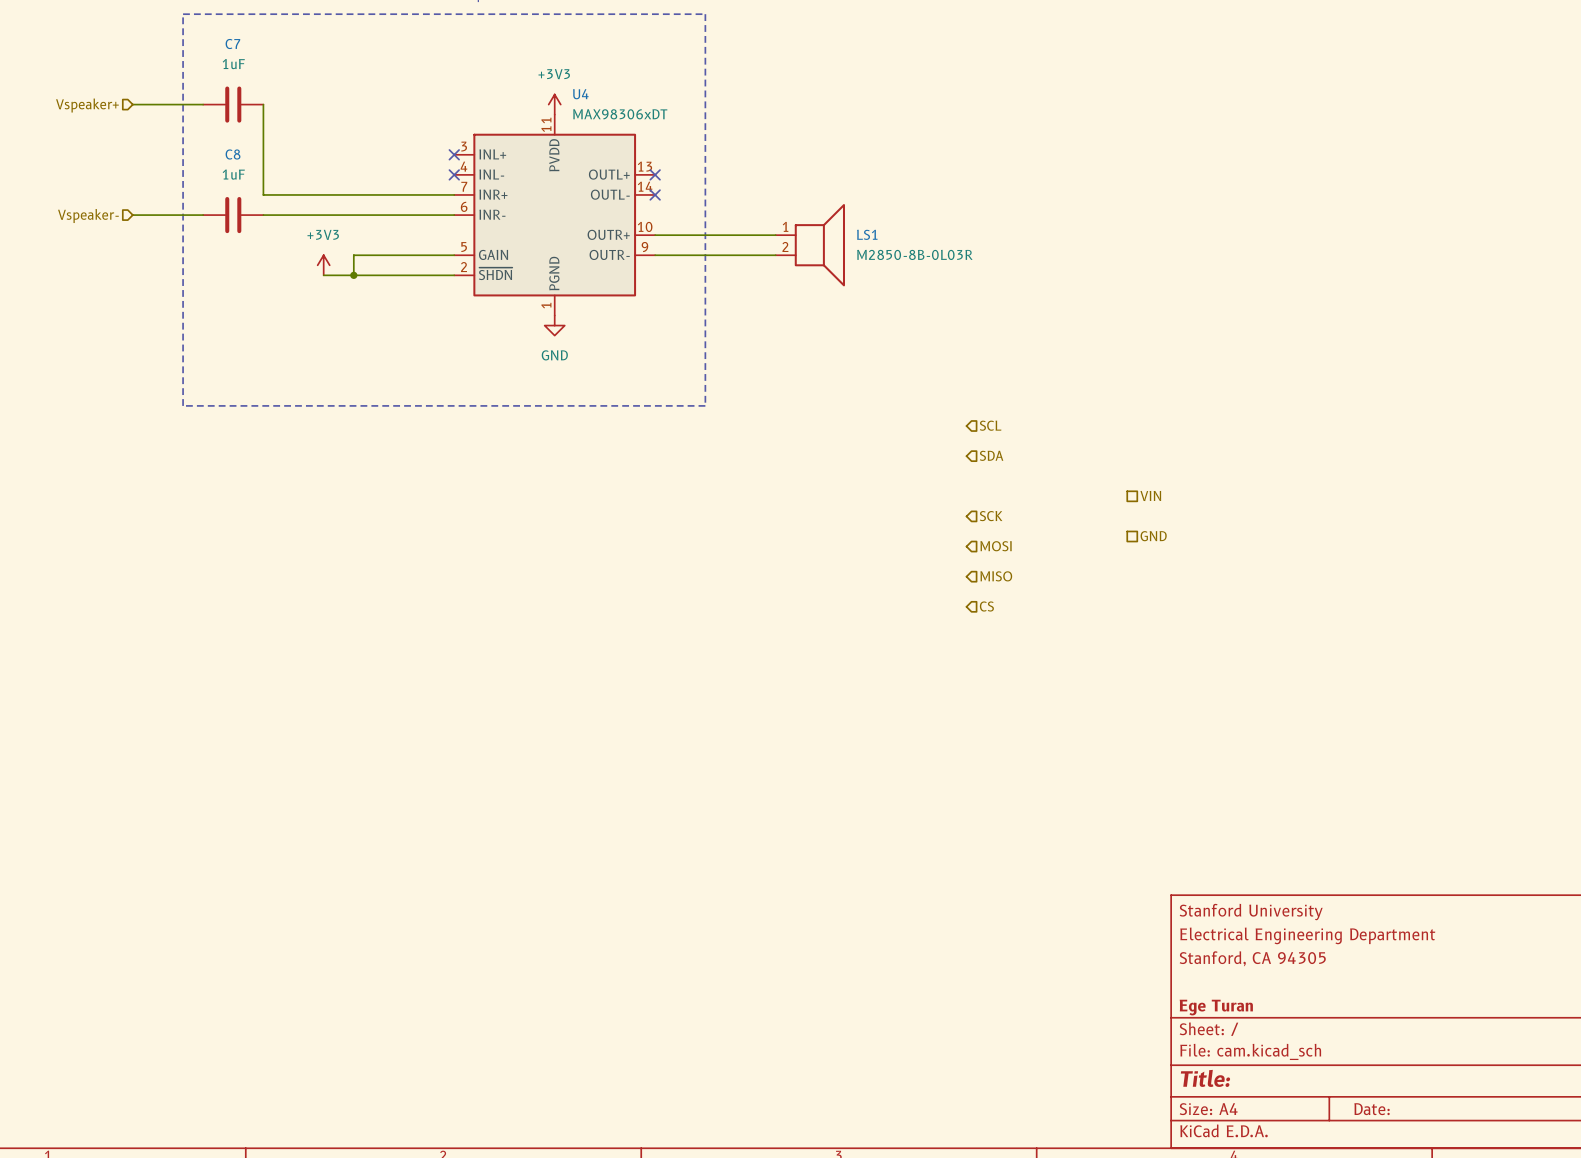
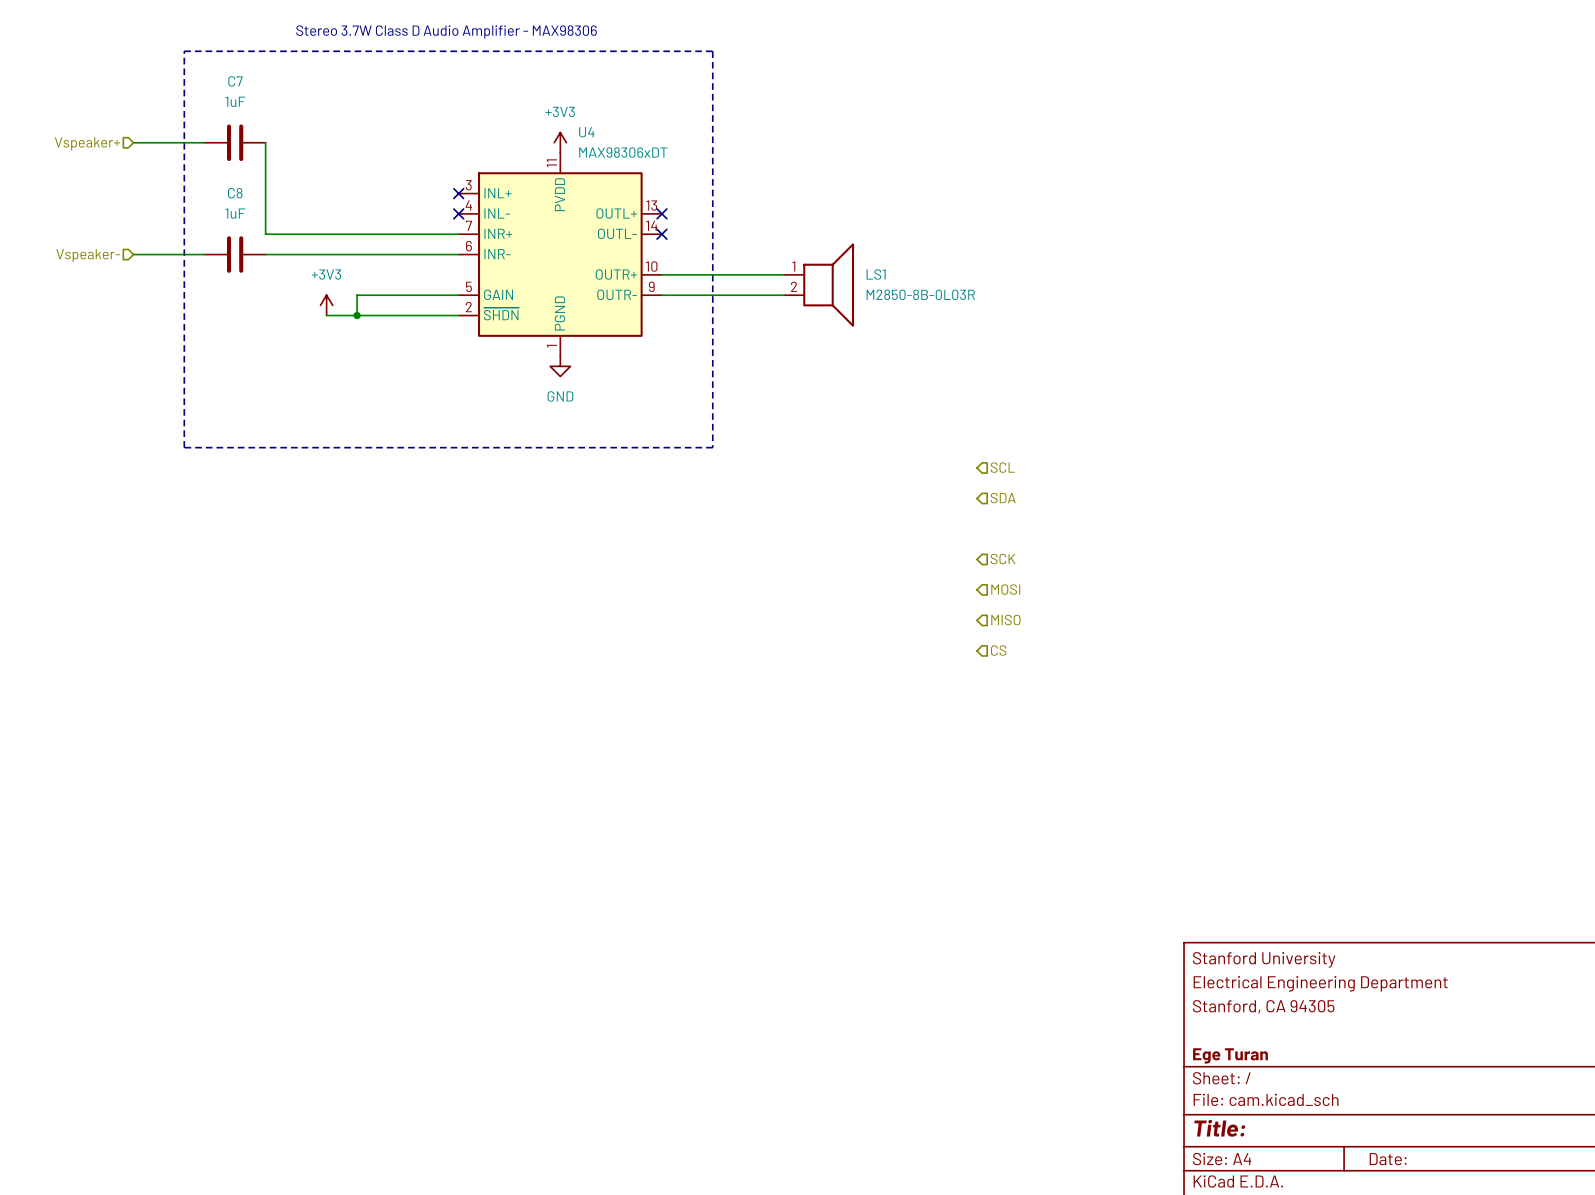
hierarchical label: VIN (1150, 496) -> none
hierarchical label: GND (1153, 536) -> none

